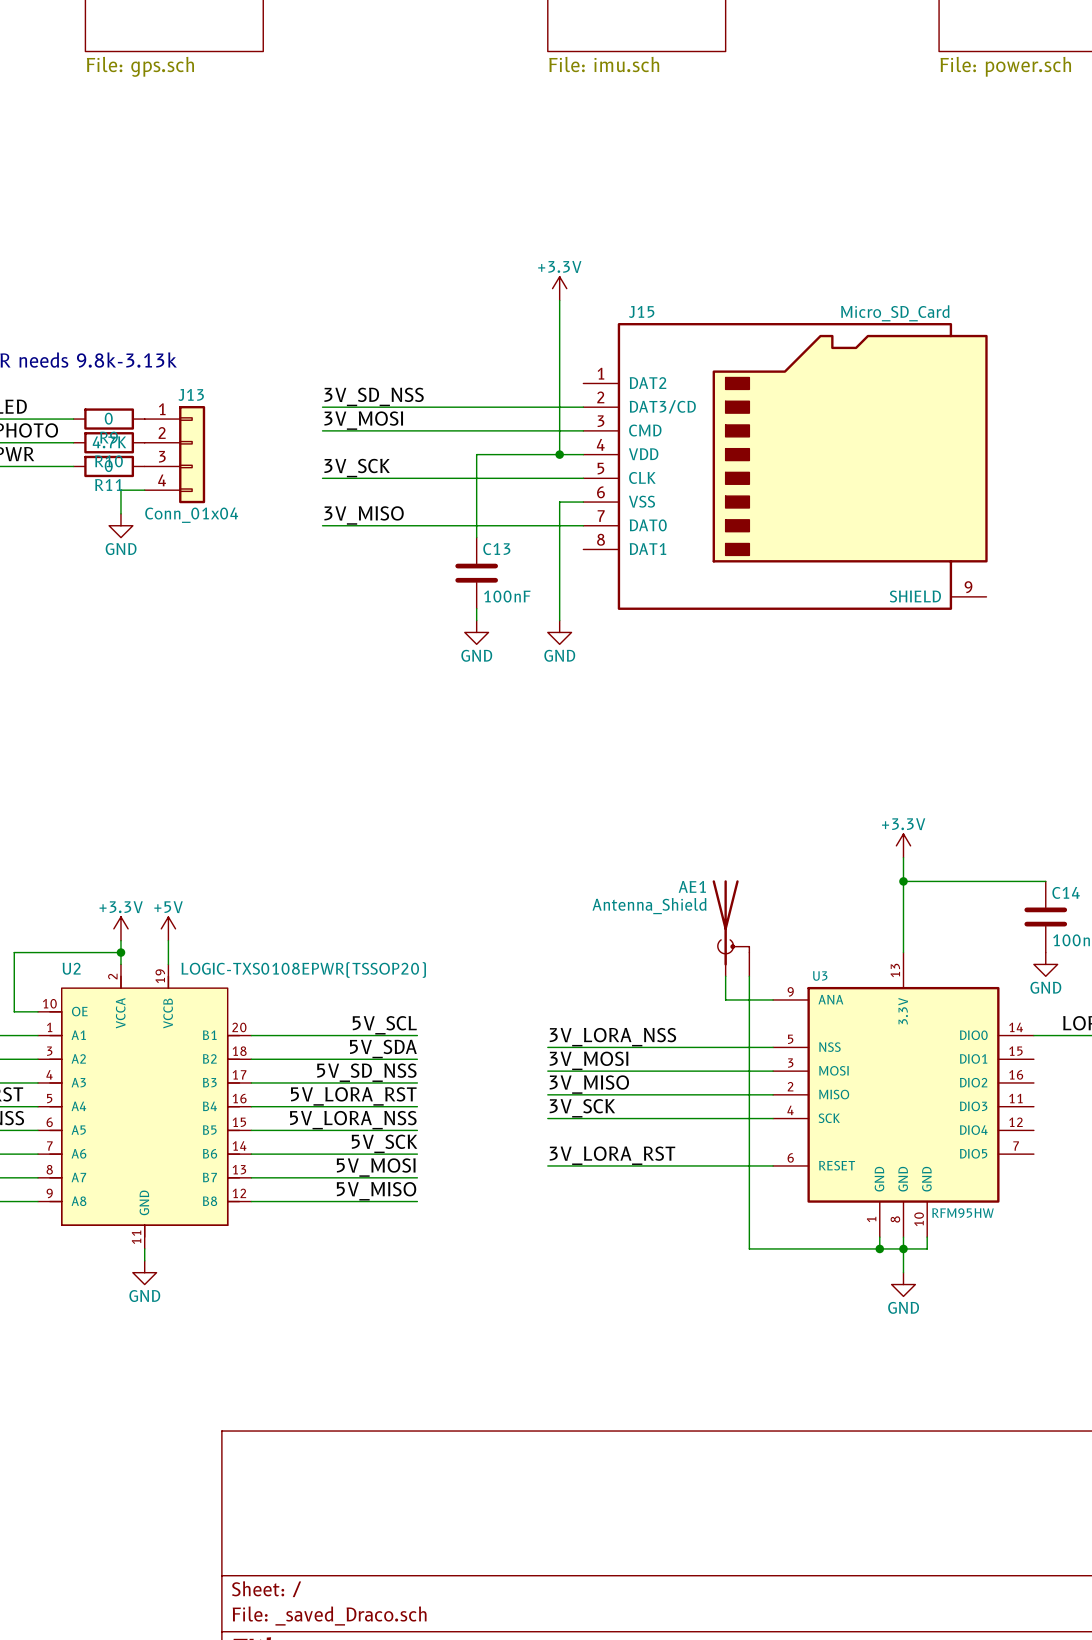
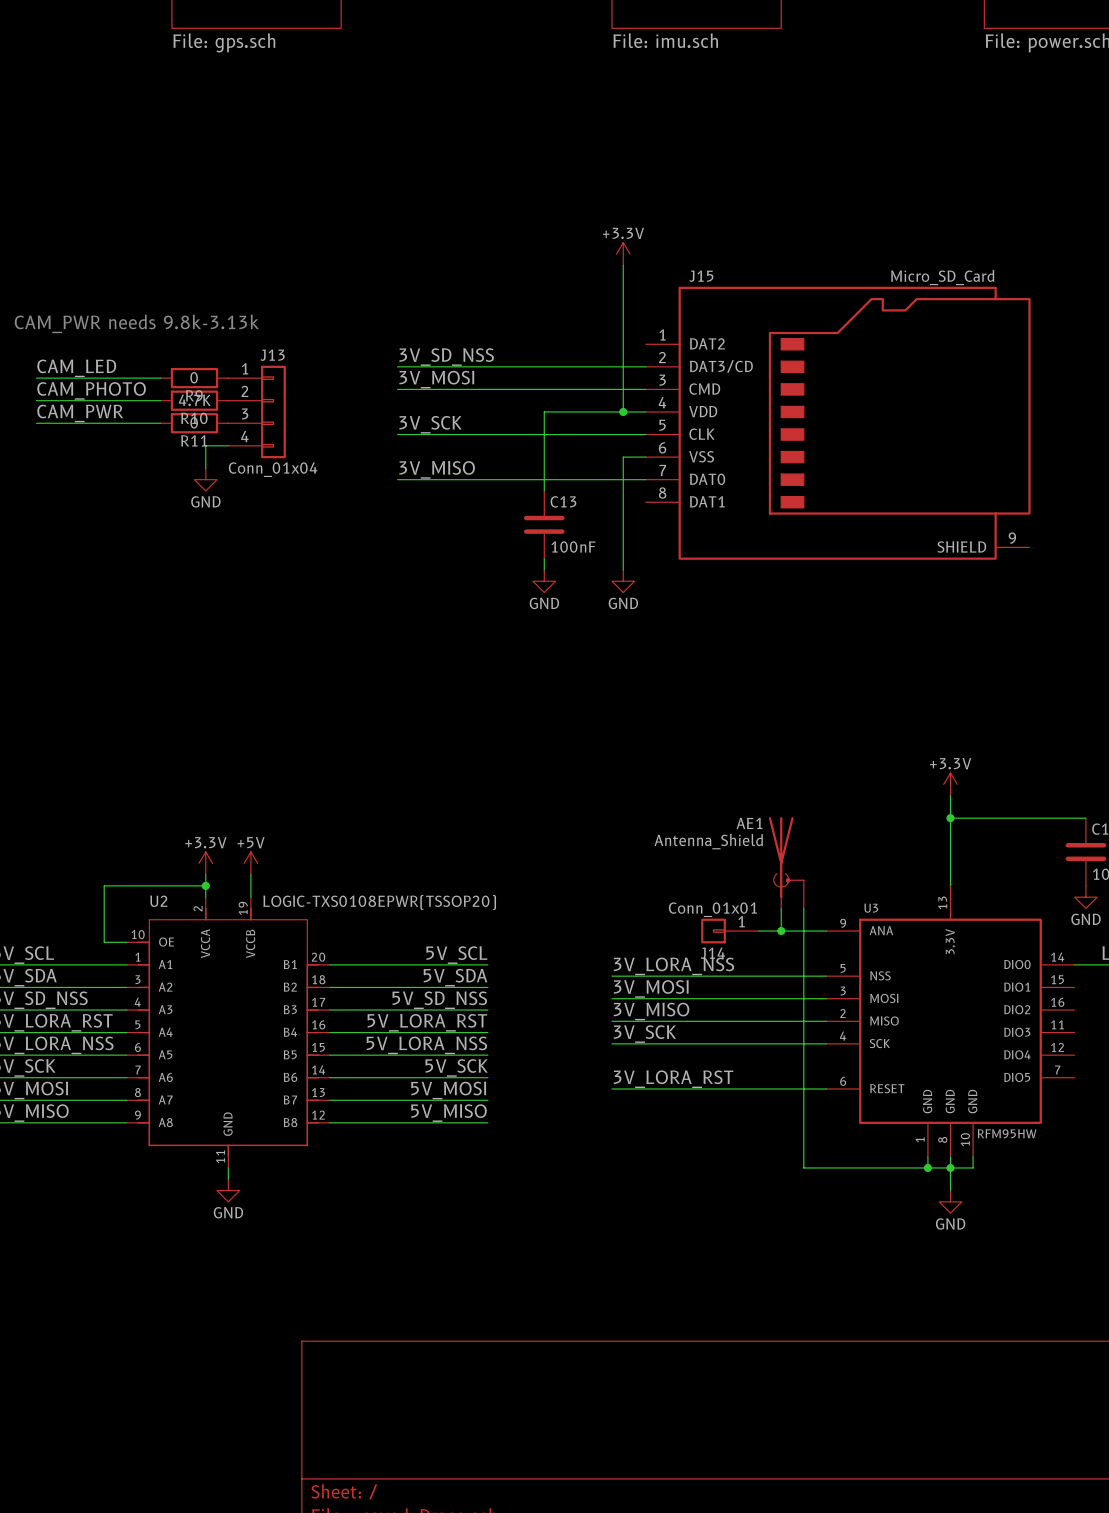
J14: none -> Conn_01x01 (729, 931)
wire: none -> (758, 931) (781, 931)
junction: none -> (781, 931)

